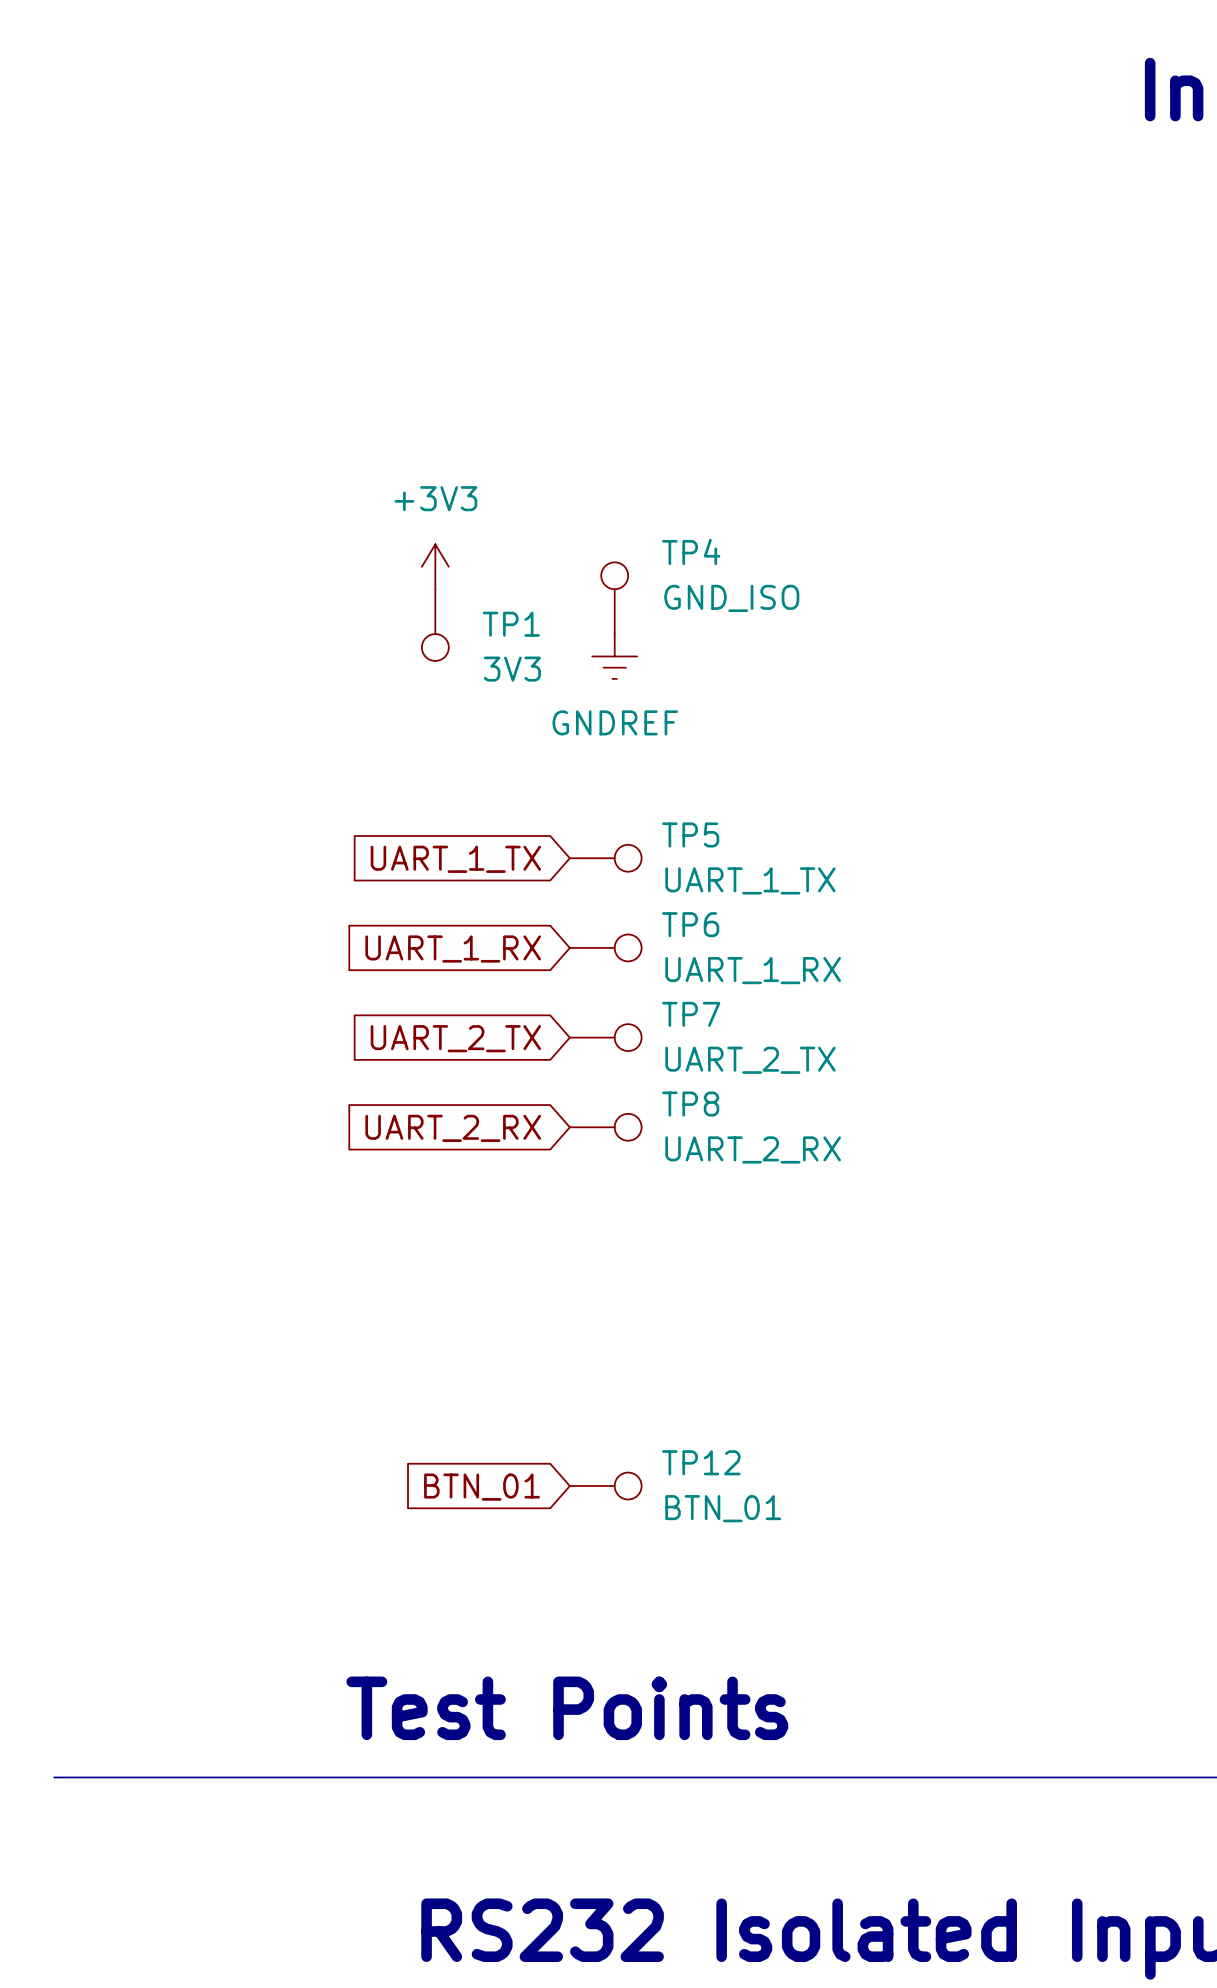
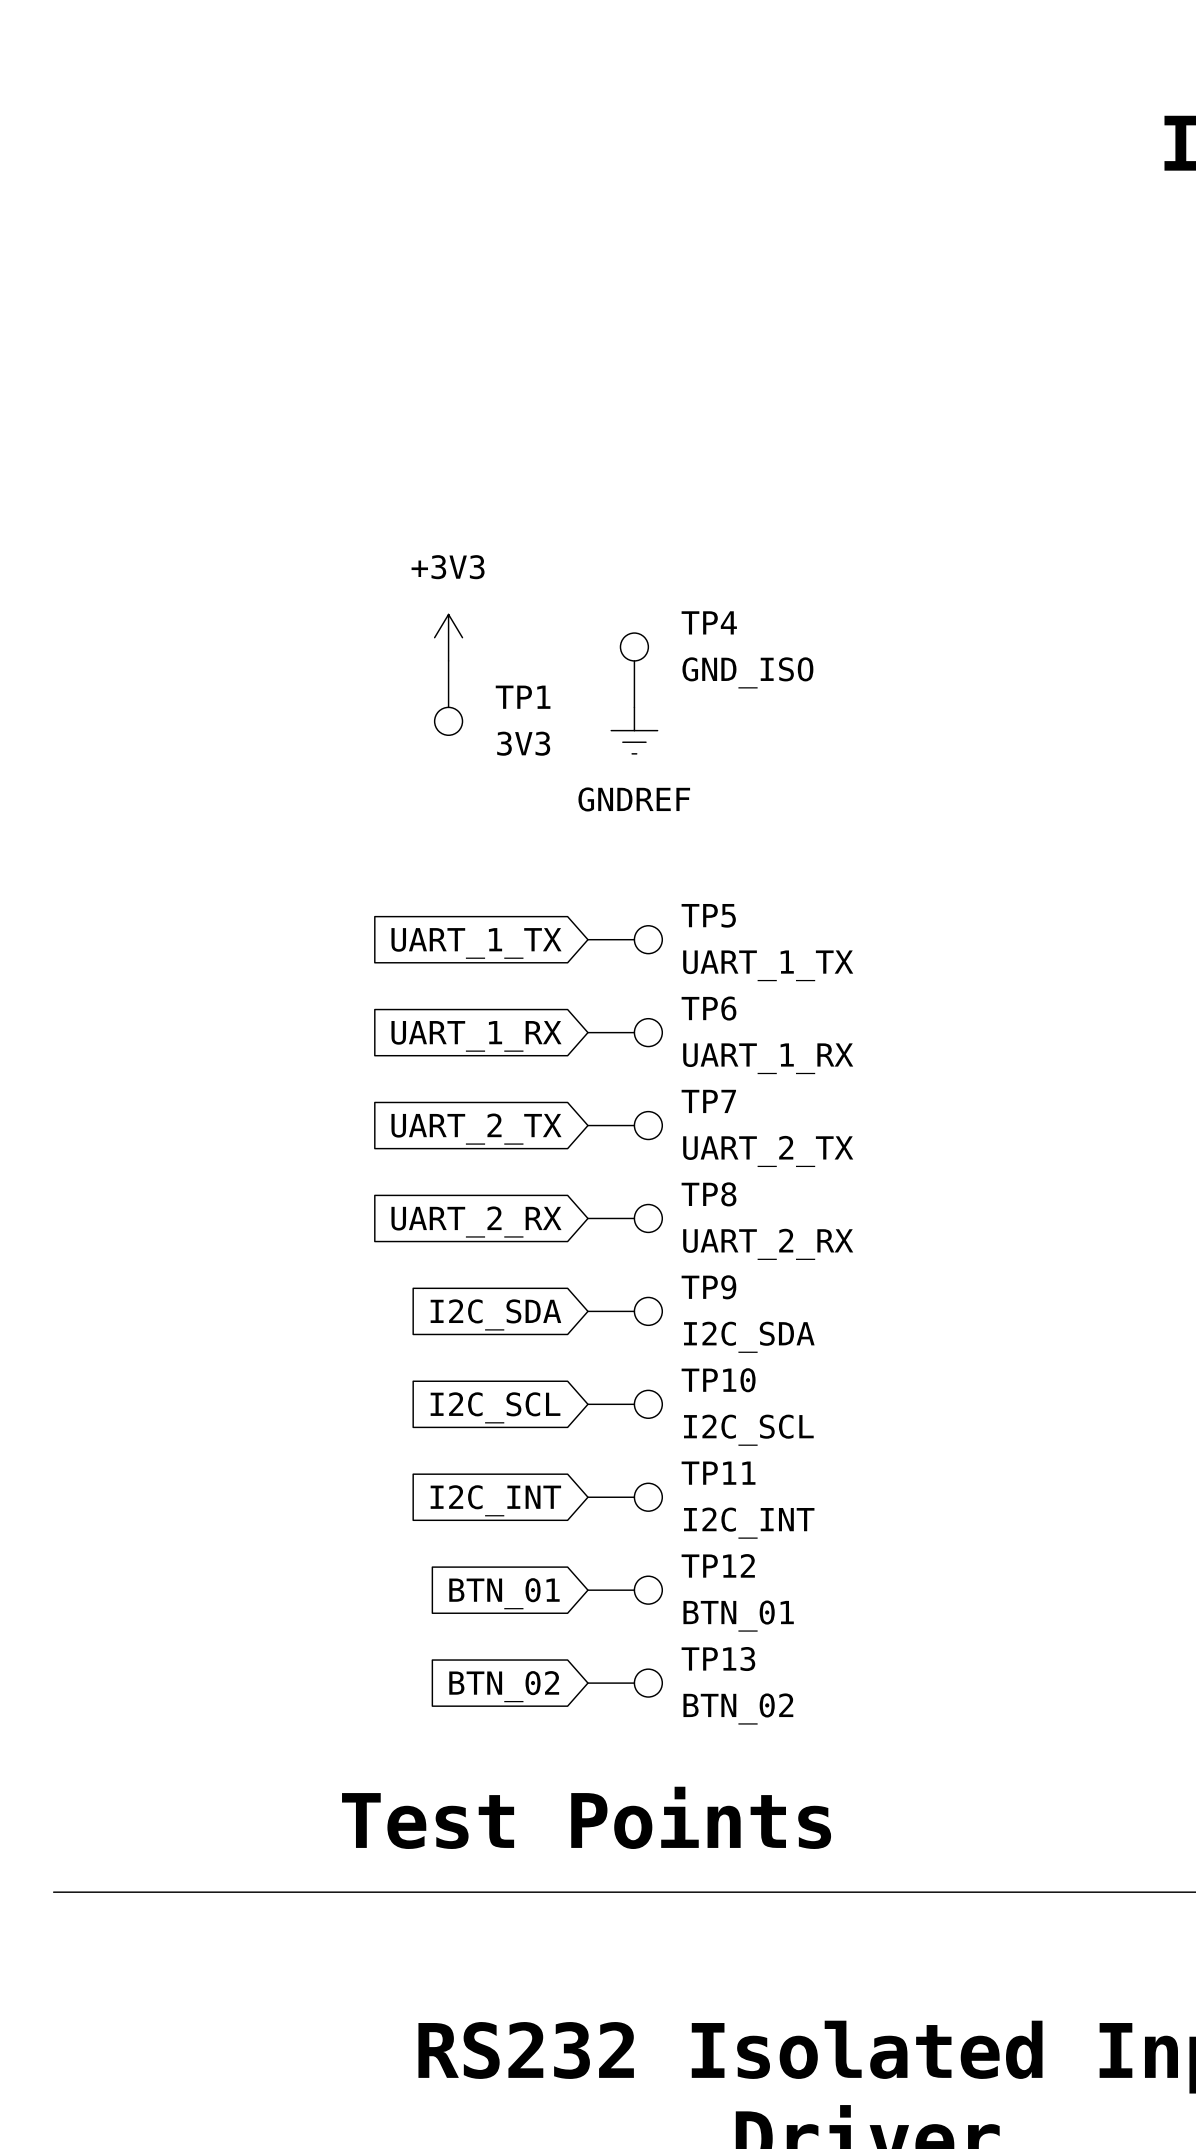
TP9: none -> I2C_SDA (625, 1311)
global label: none -> I2C_SDA (495, 1314)
TP10: none -> I2C_SCL (625, 1404)
global label: none -> I2C_SCL (495, 1407)
TP11: none -> I2C_INT (625, 1497)
global label: none -> I2C_INT (495, 1500)
TP13: none -> BTN_02 (625, 1683)
global label: none -> BTN_02 (504, 1686)

